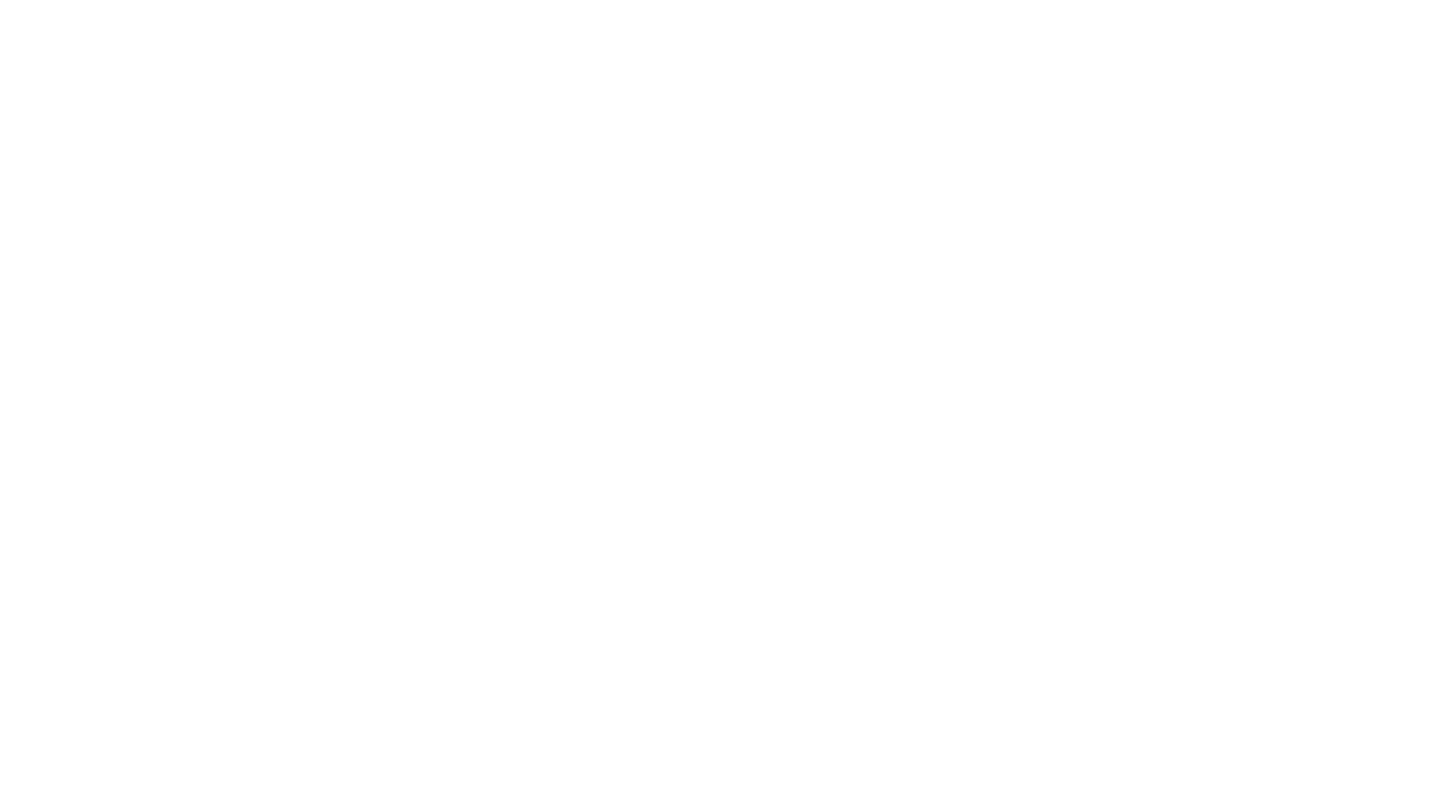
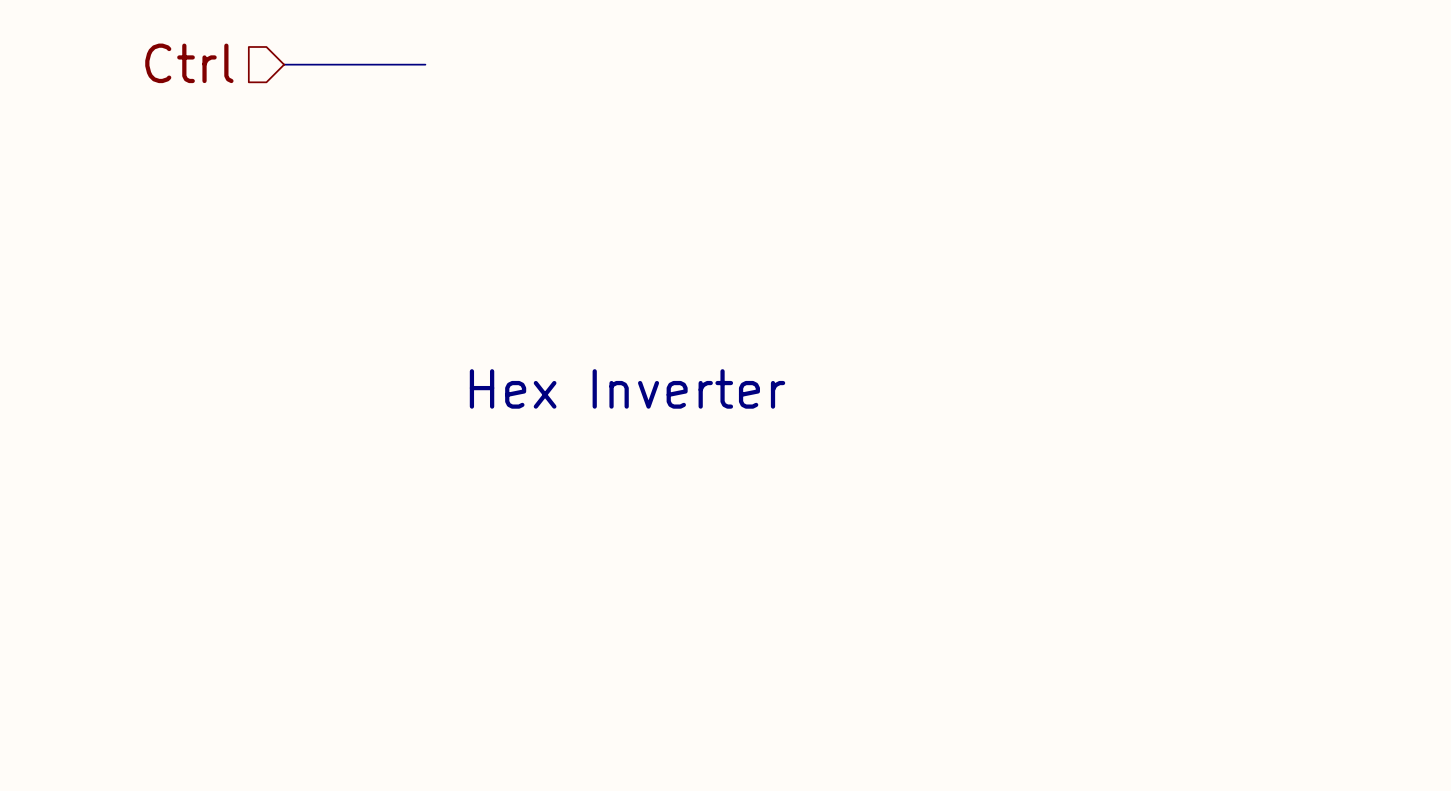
hierarchical label: none -> Ctrl (189, 63)
wire: none -> (284, 64) (425, 64)
text: none -> Hex Inverter (627, 388)

